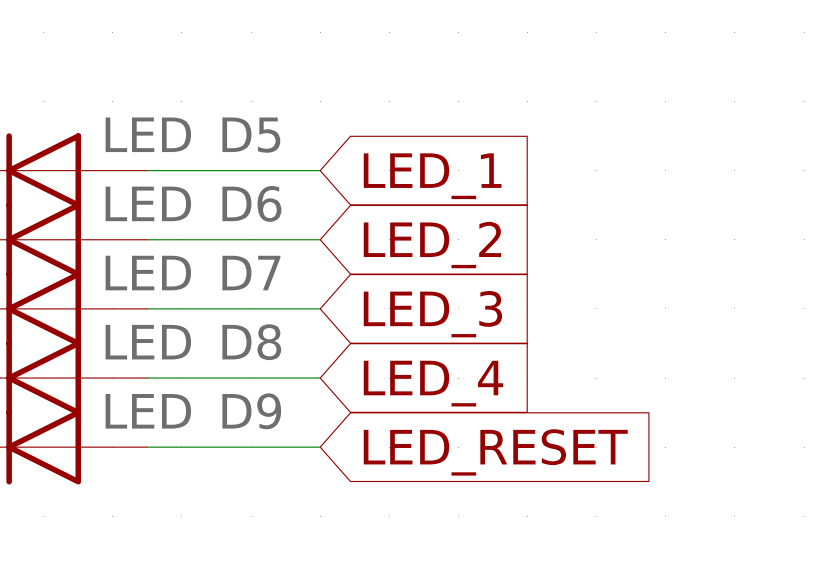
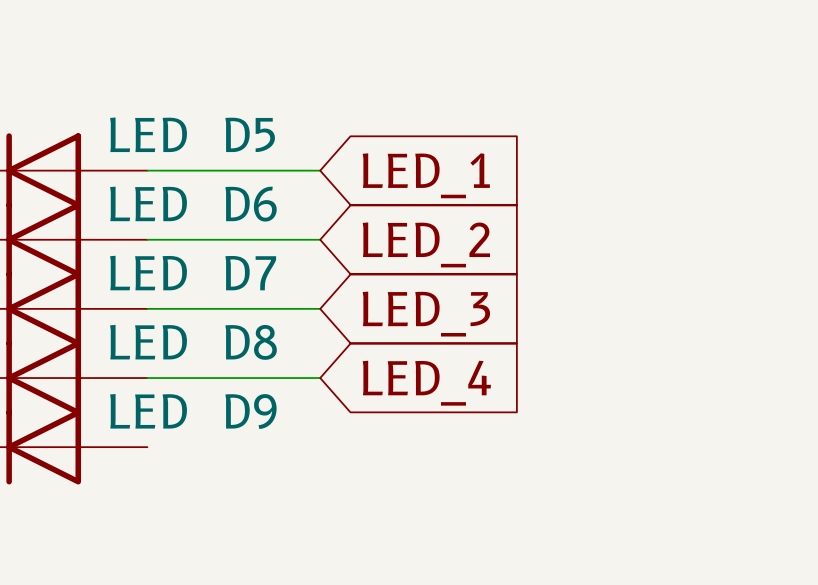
wire: (147, 447) (320, 447) -> none
global label: LED_RESET (495, 452) -> none

